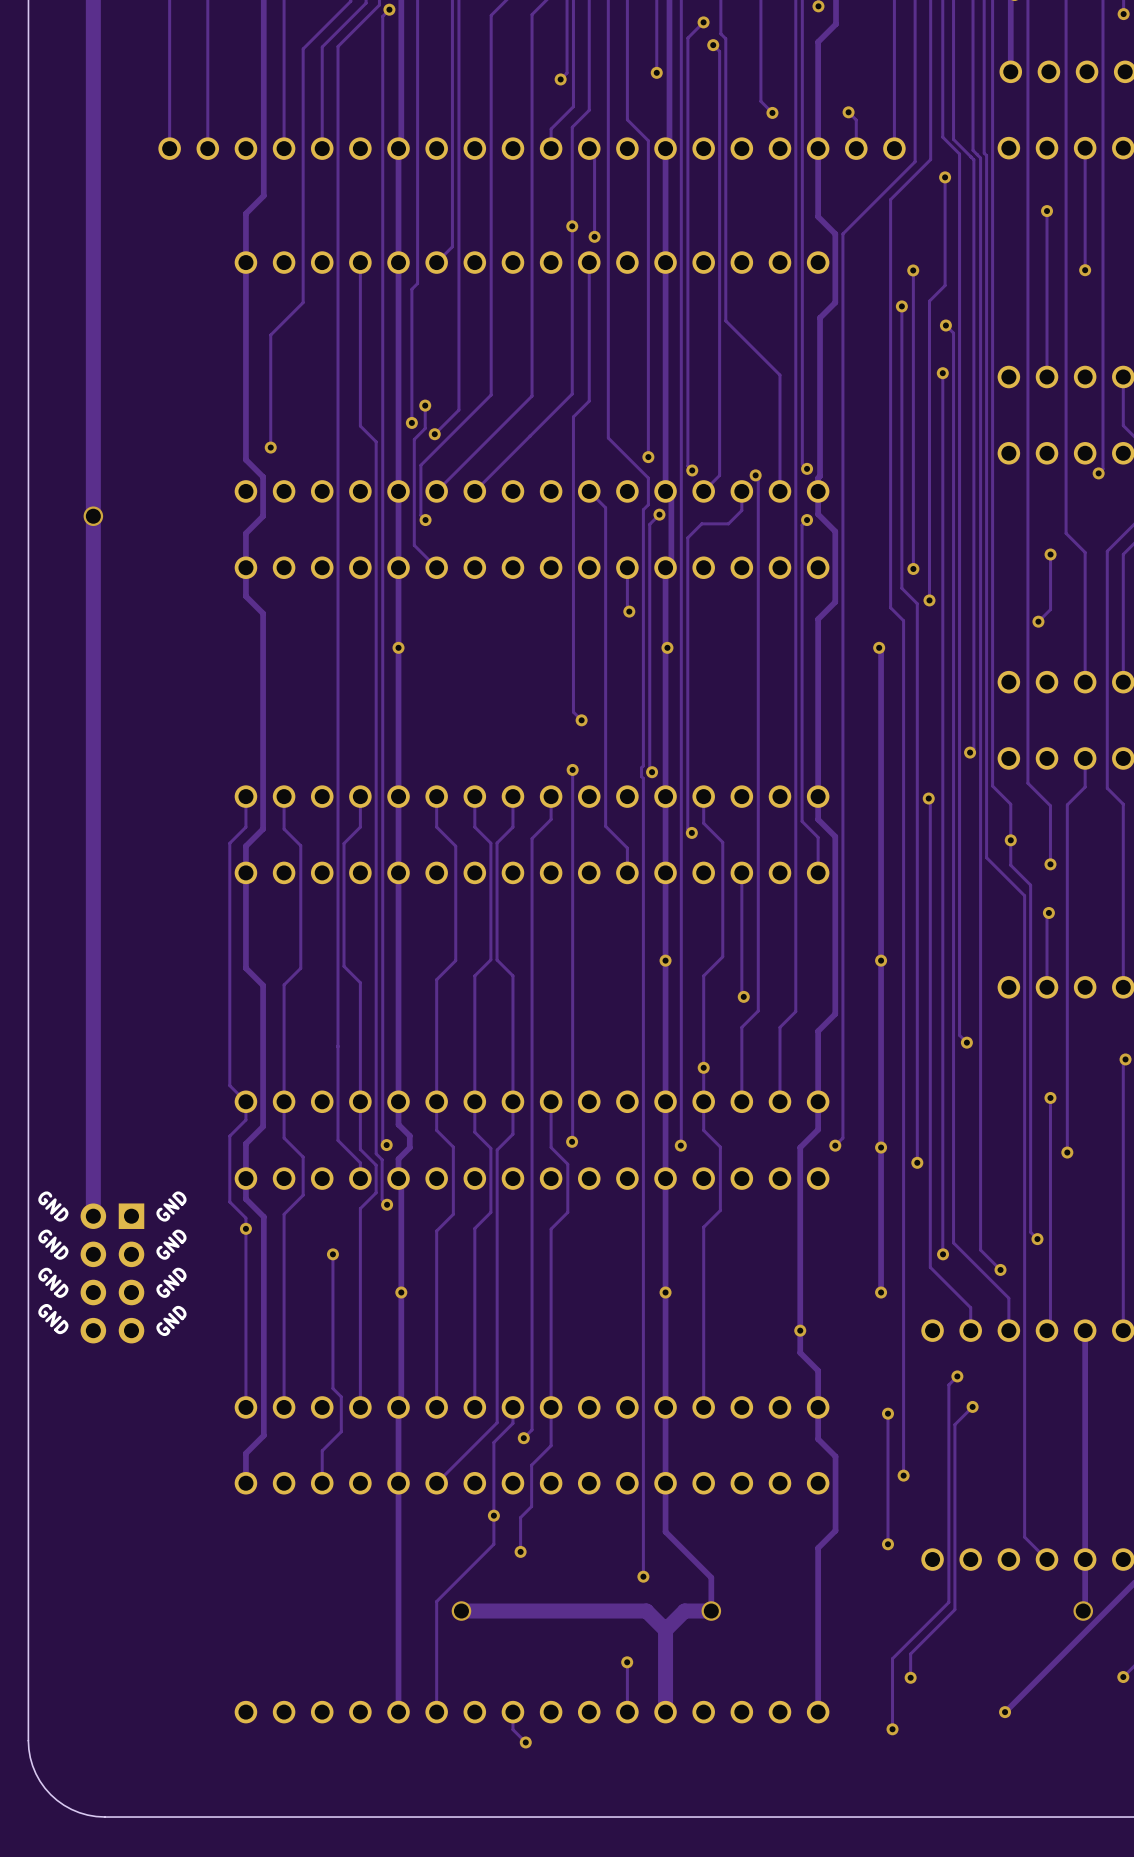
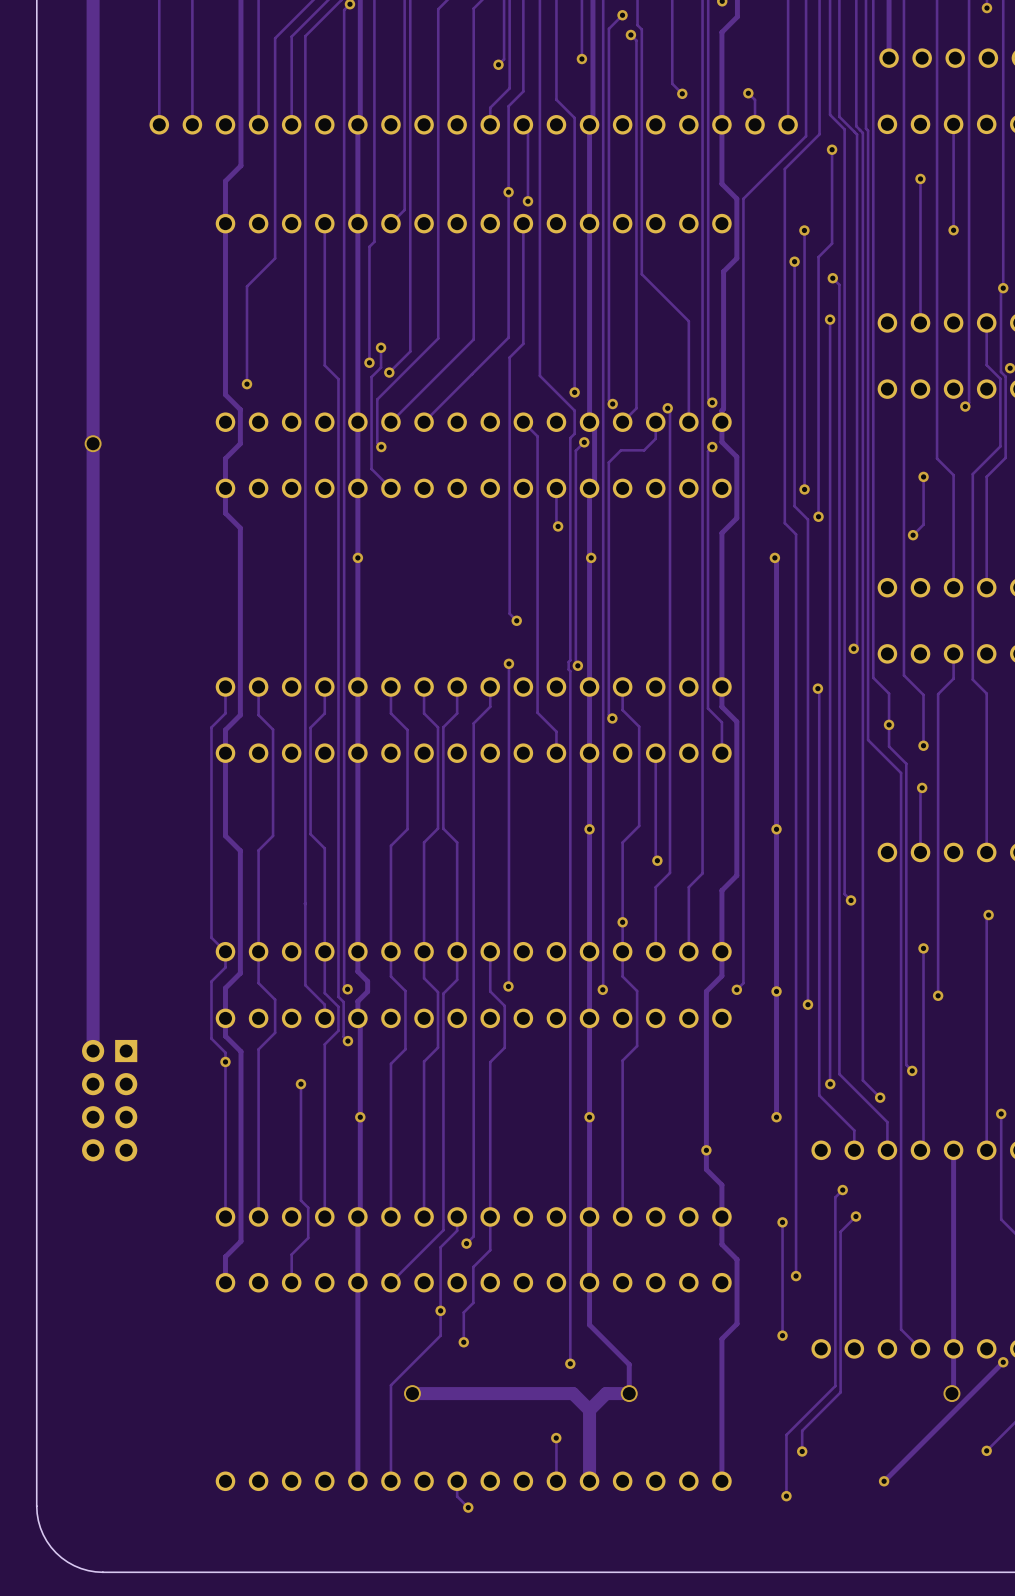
text: GND (53, 1206) -> none
text: GND (171, 1206) -> none
text: GND (53, 1244) -> none
text: GND (171, 1244) -> none
text: GND (53, 1282) -> none
text: GND (171, 1282) -> none
text: GND (53, 1319) -> none
text: GND (171, 1320) -> none

